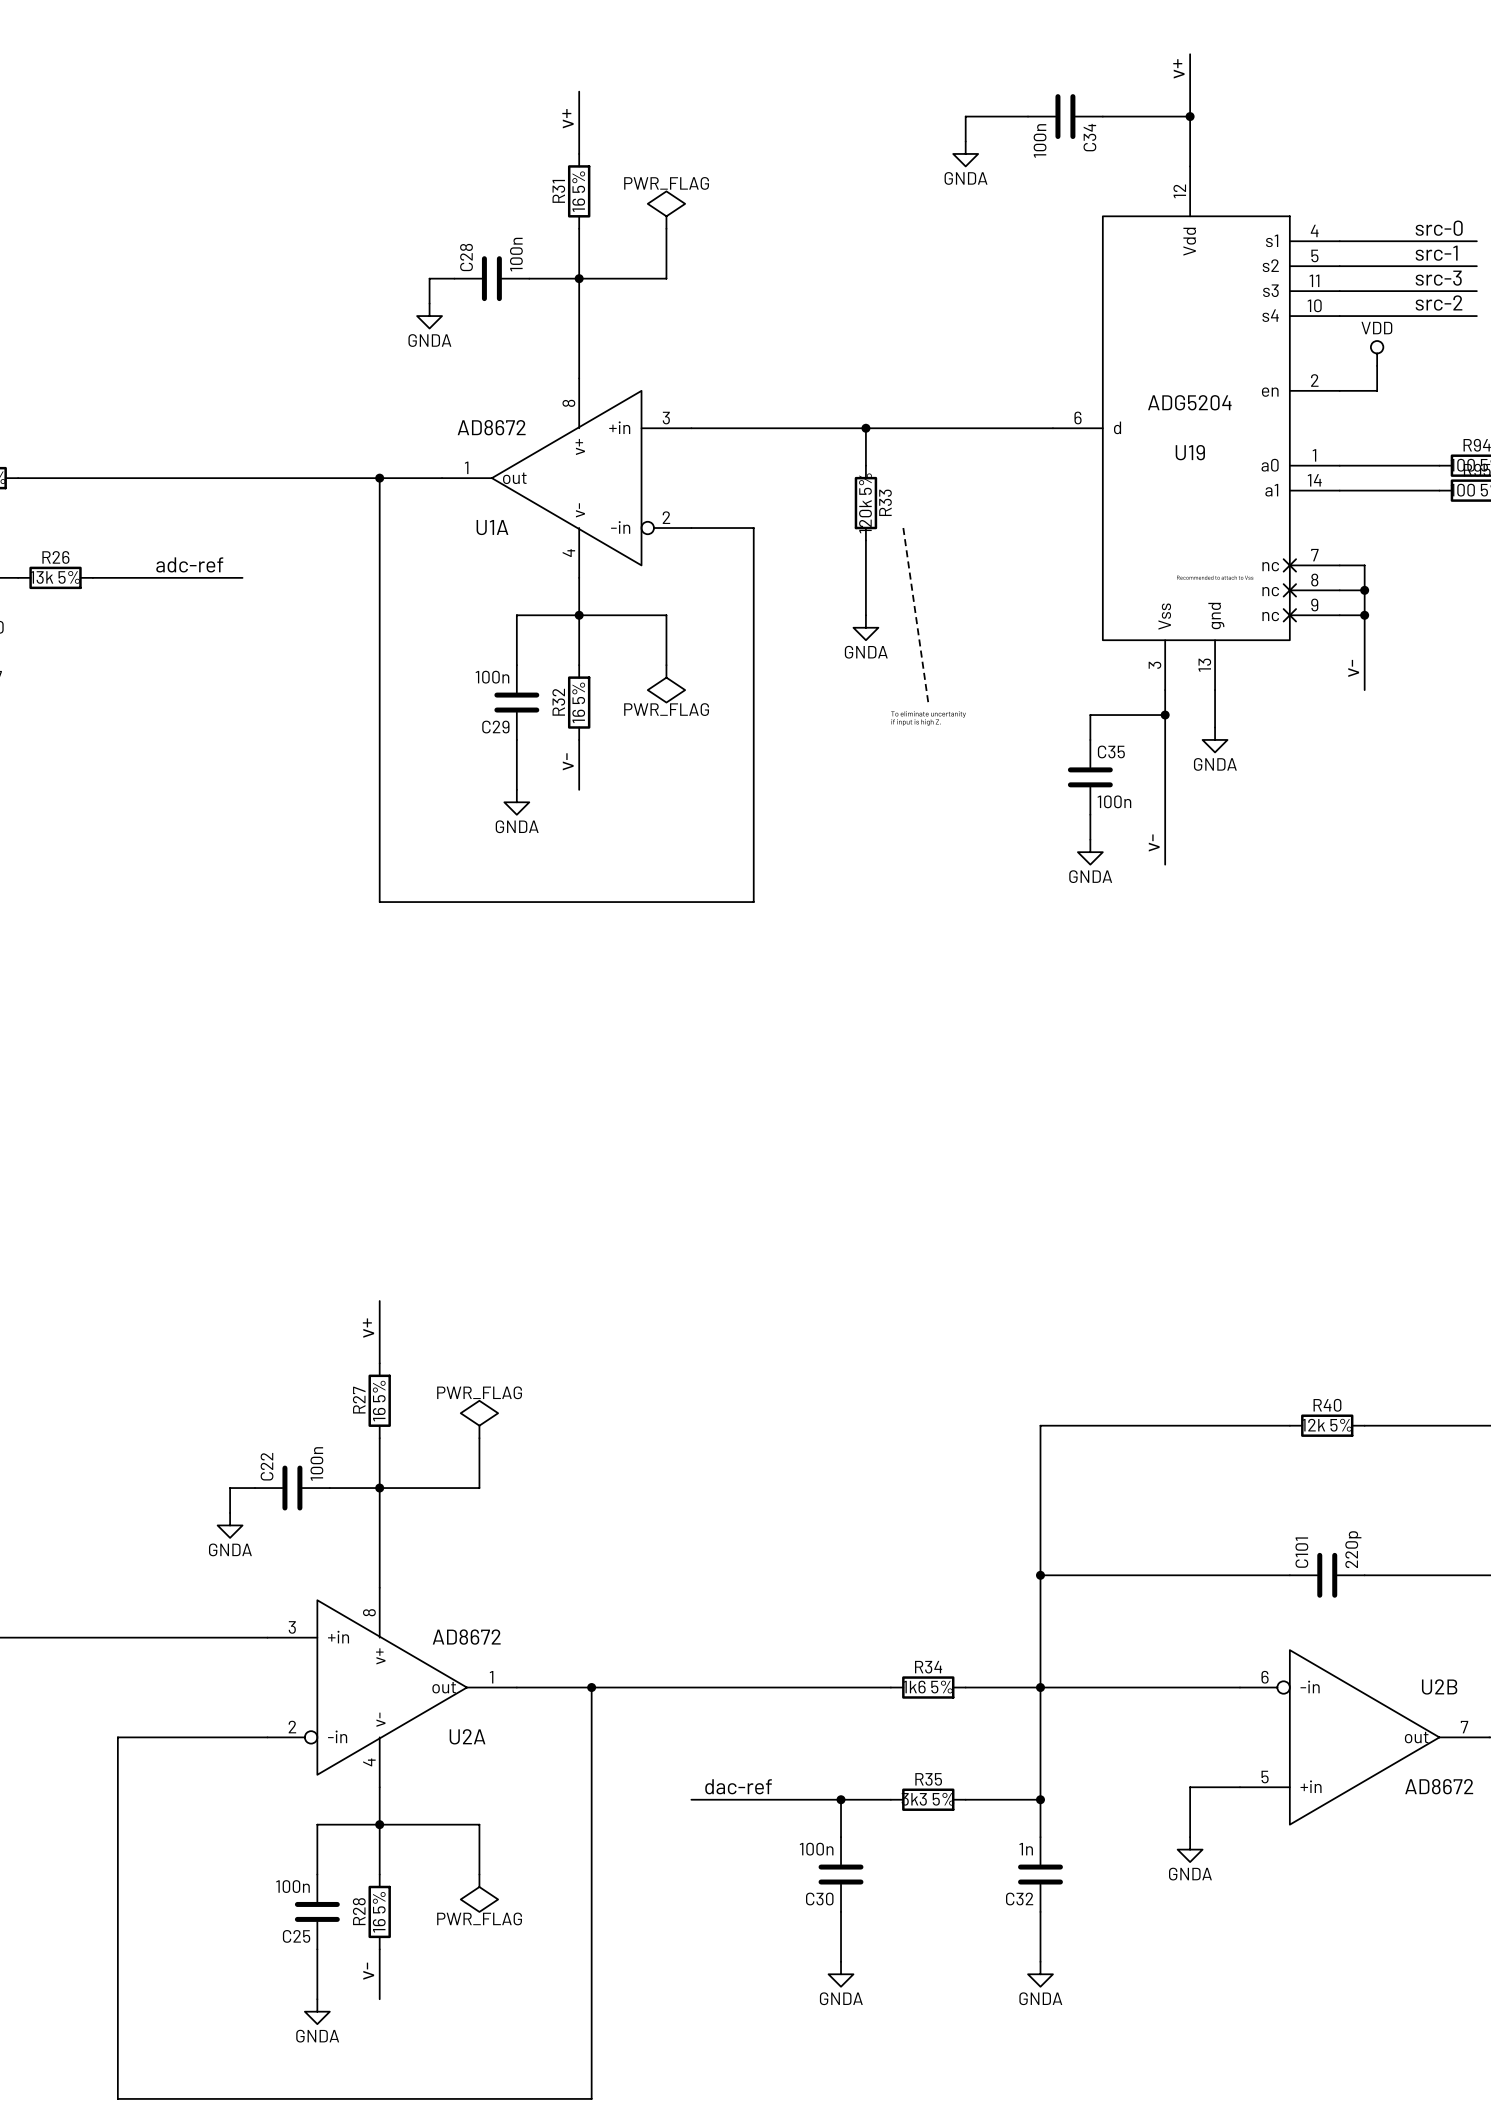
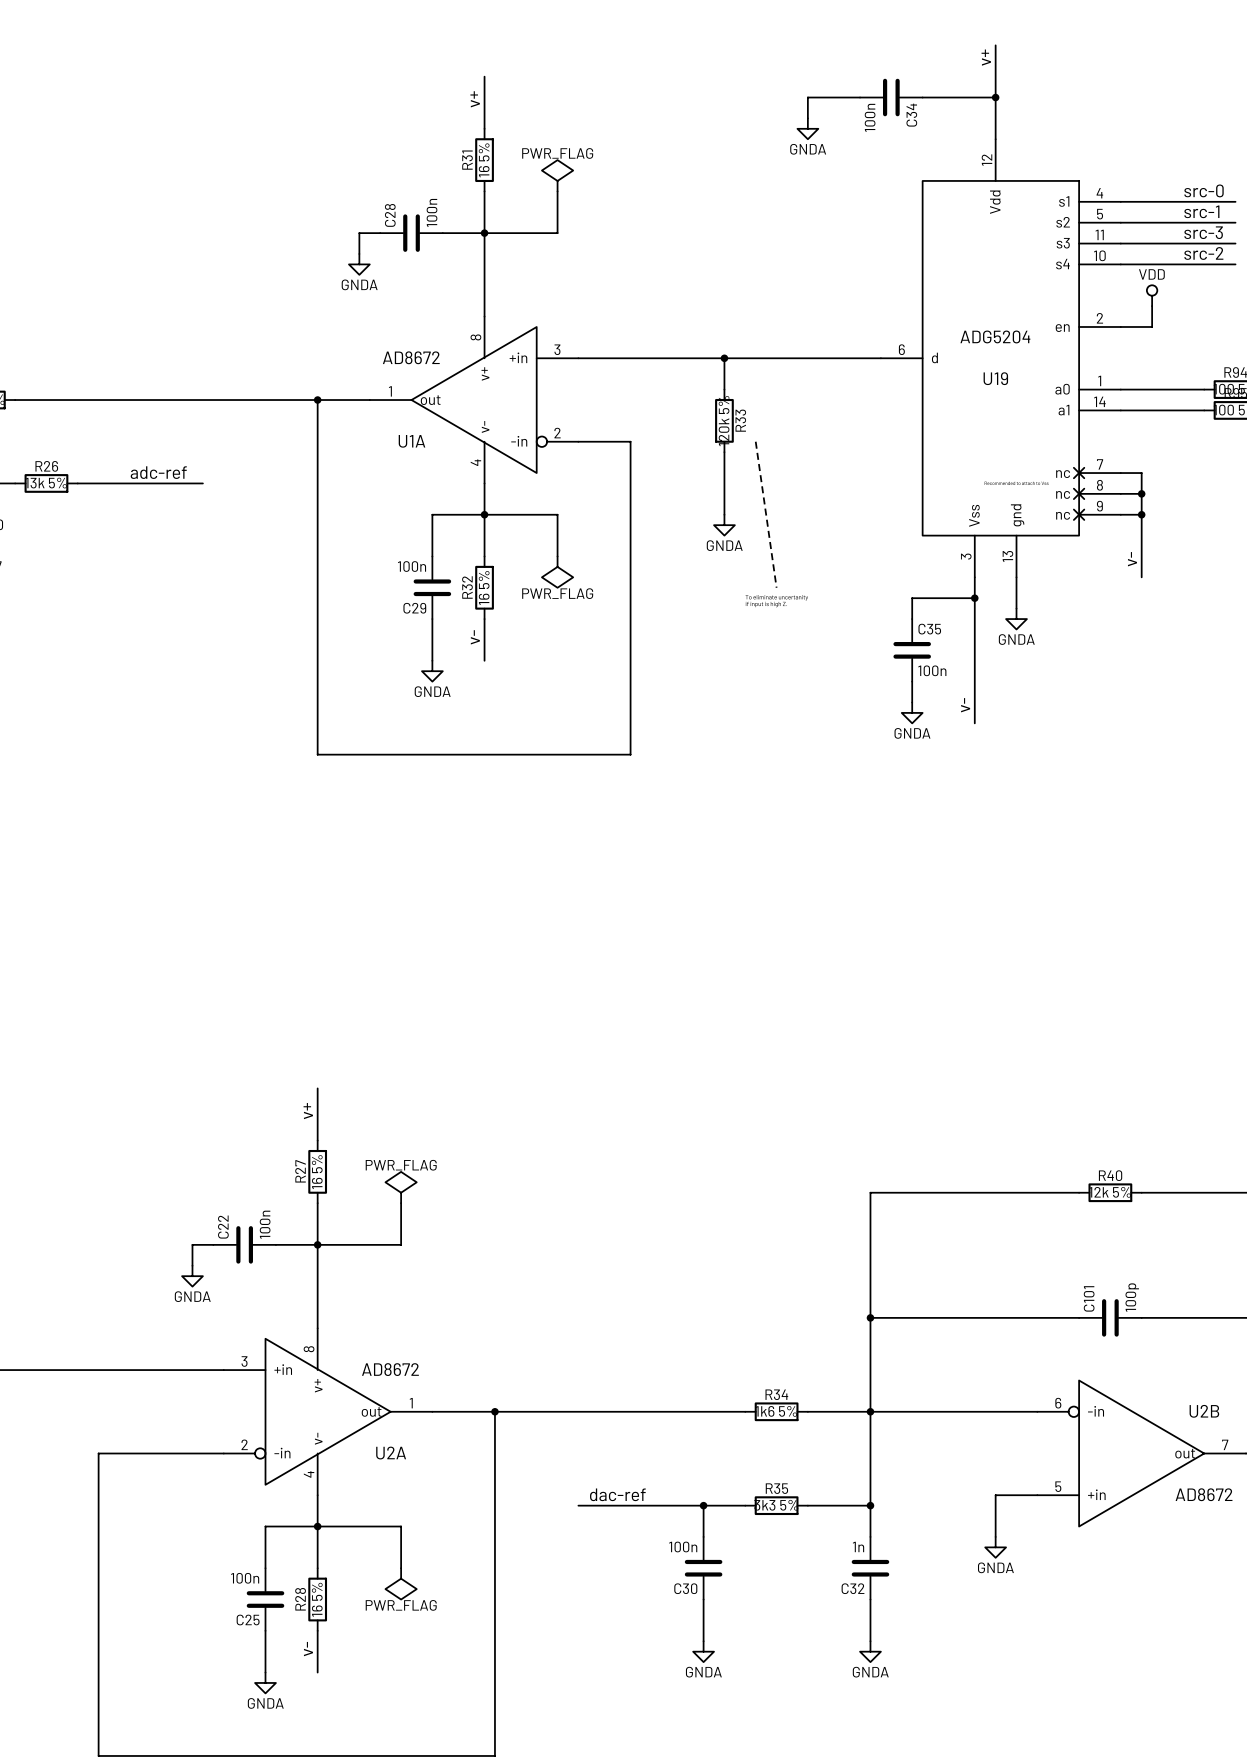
C101 value: 220p (1353, 1549) -> 100p (1132, 1297)

